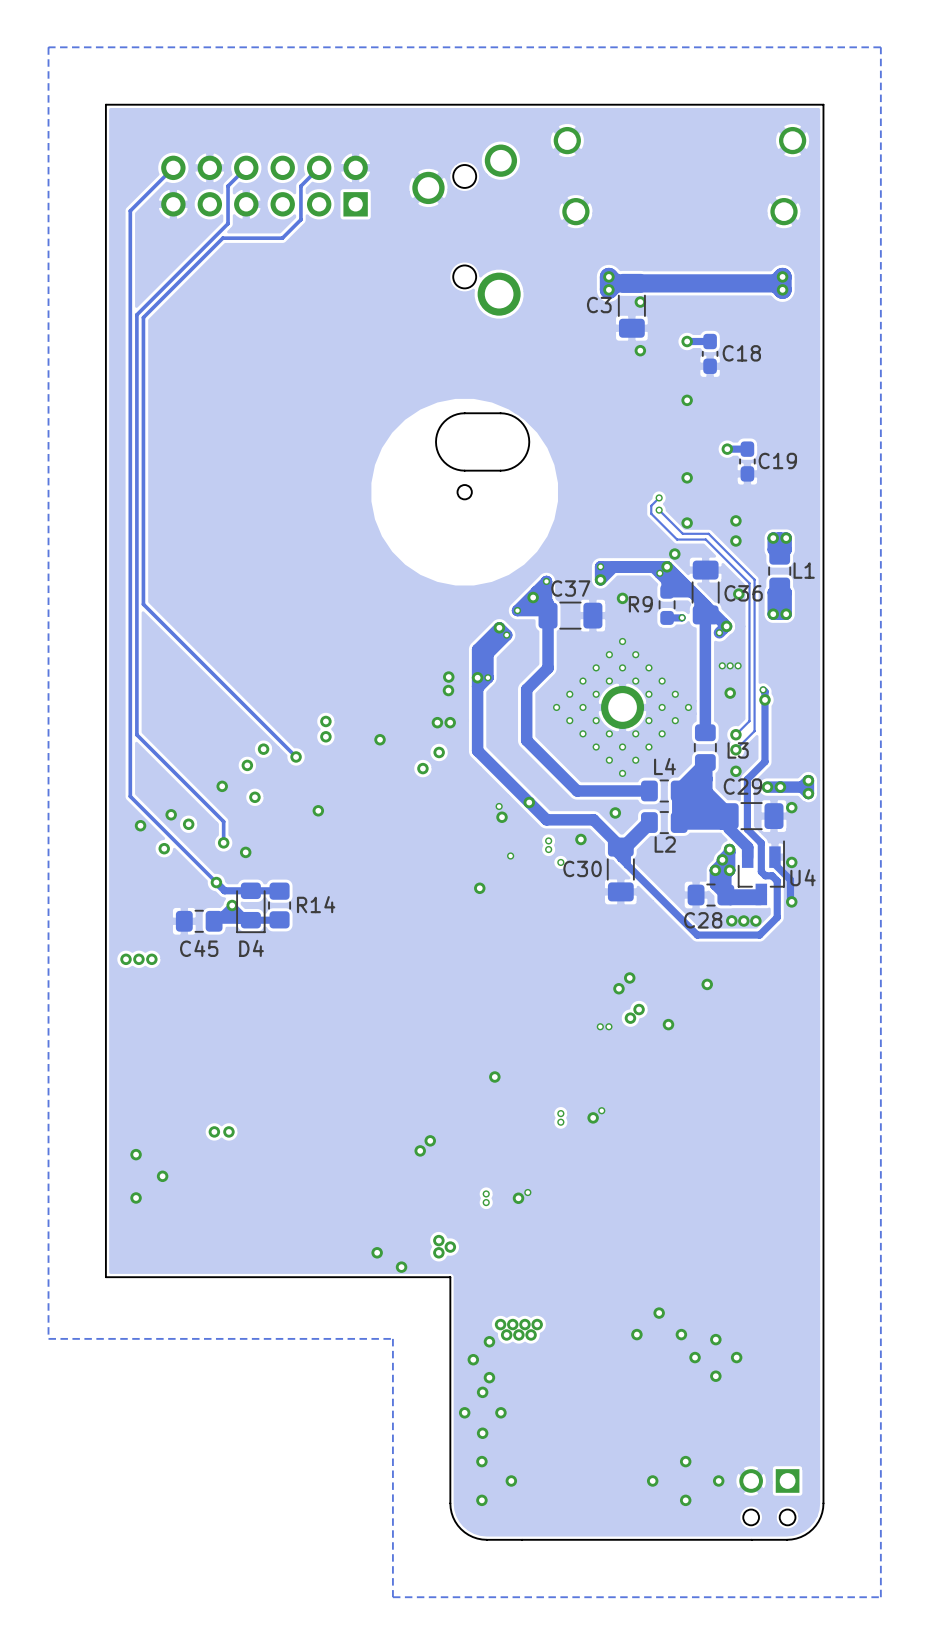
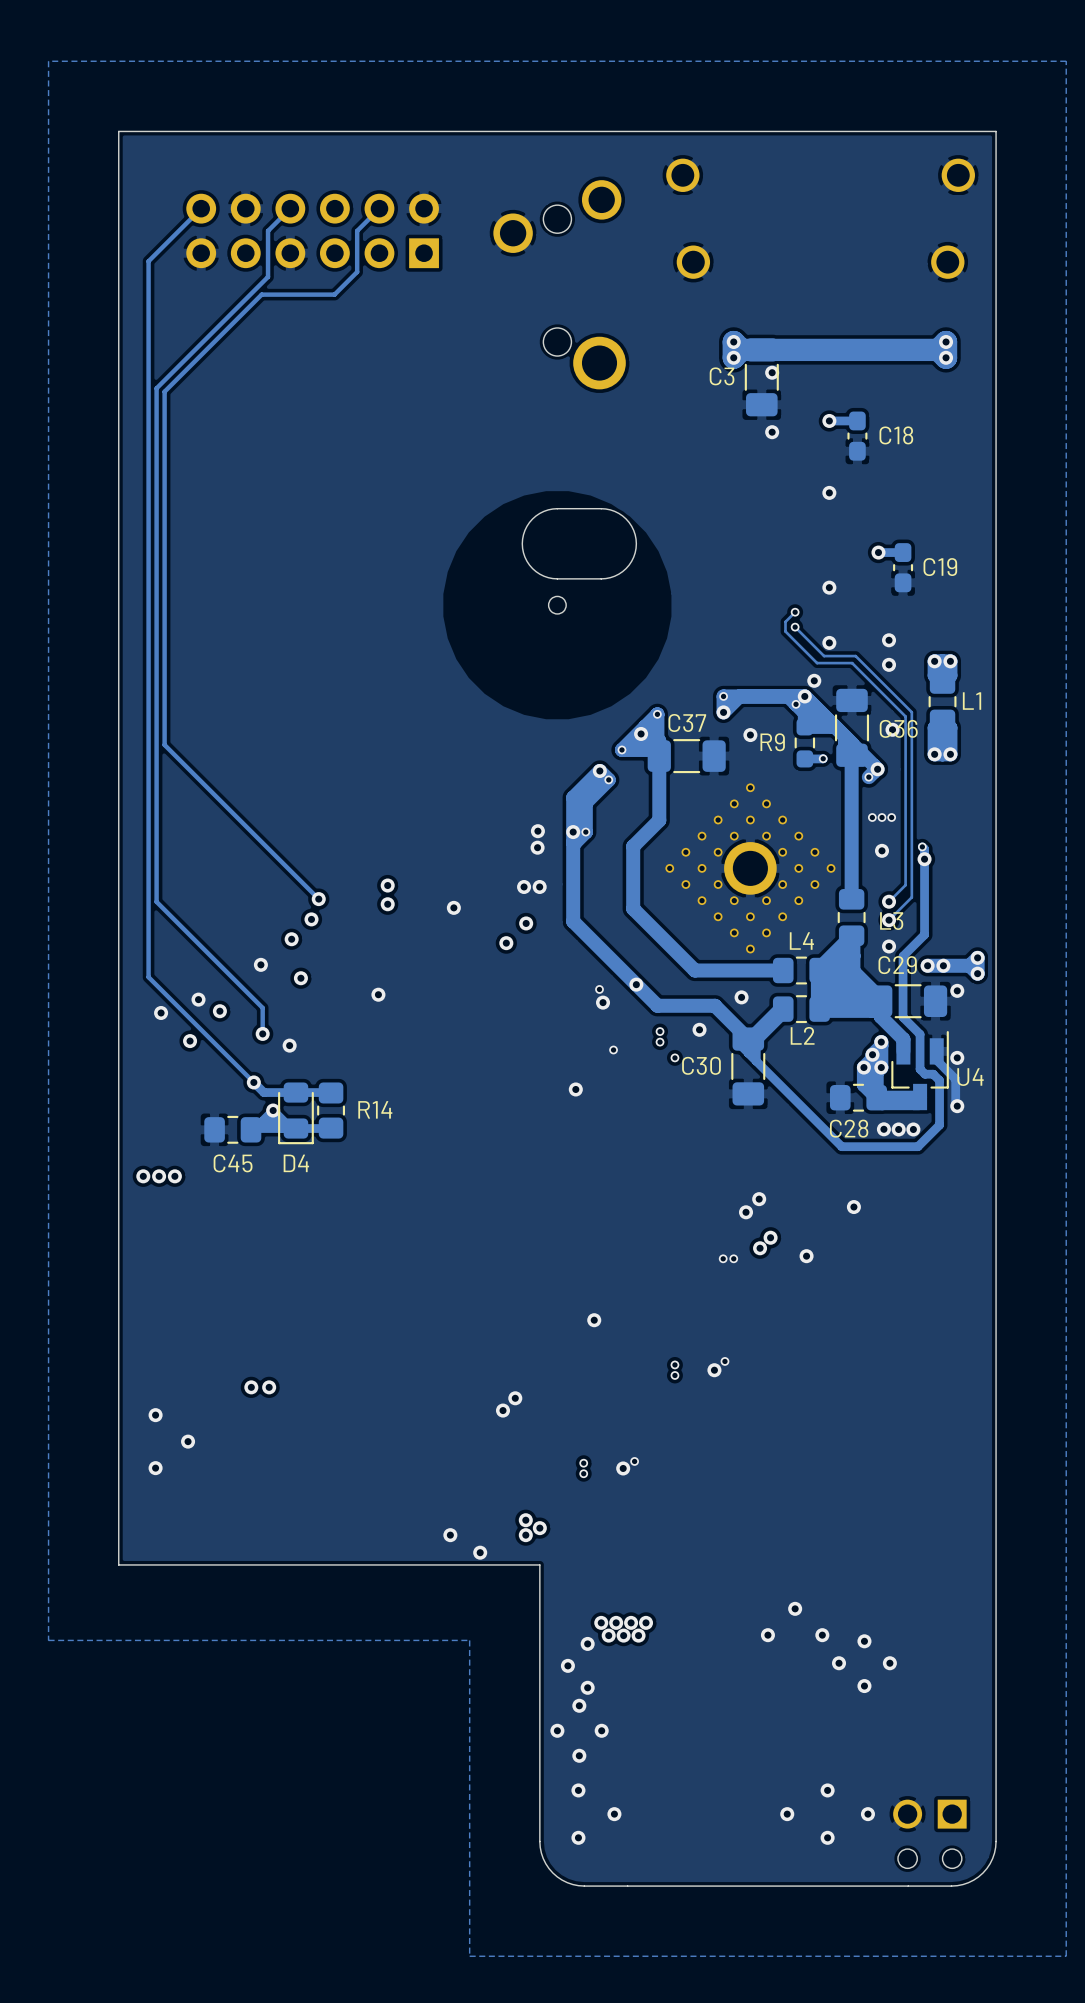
track: (143, 604) (296, 756) -> (164, 742) (164, 744) (318, 899)
via position: (296, 756) -> (318, 899)

